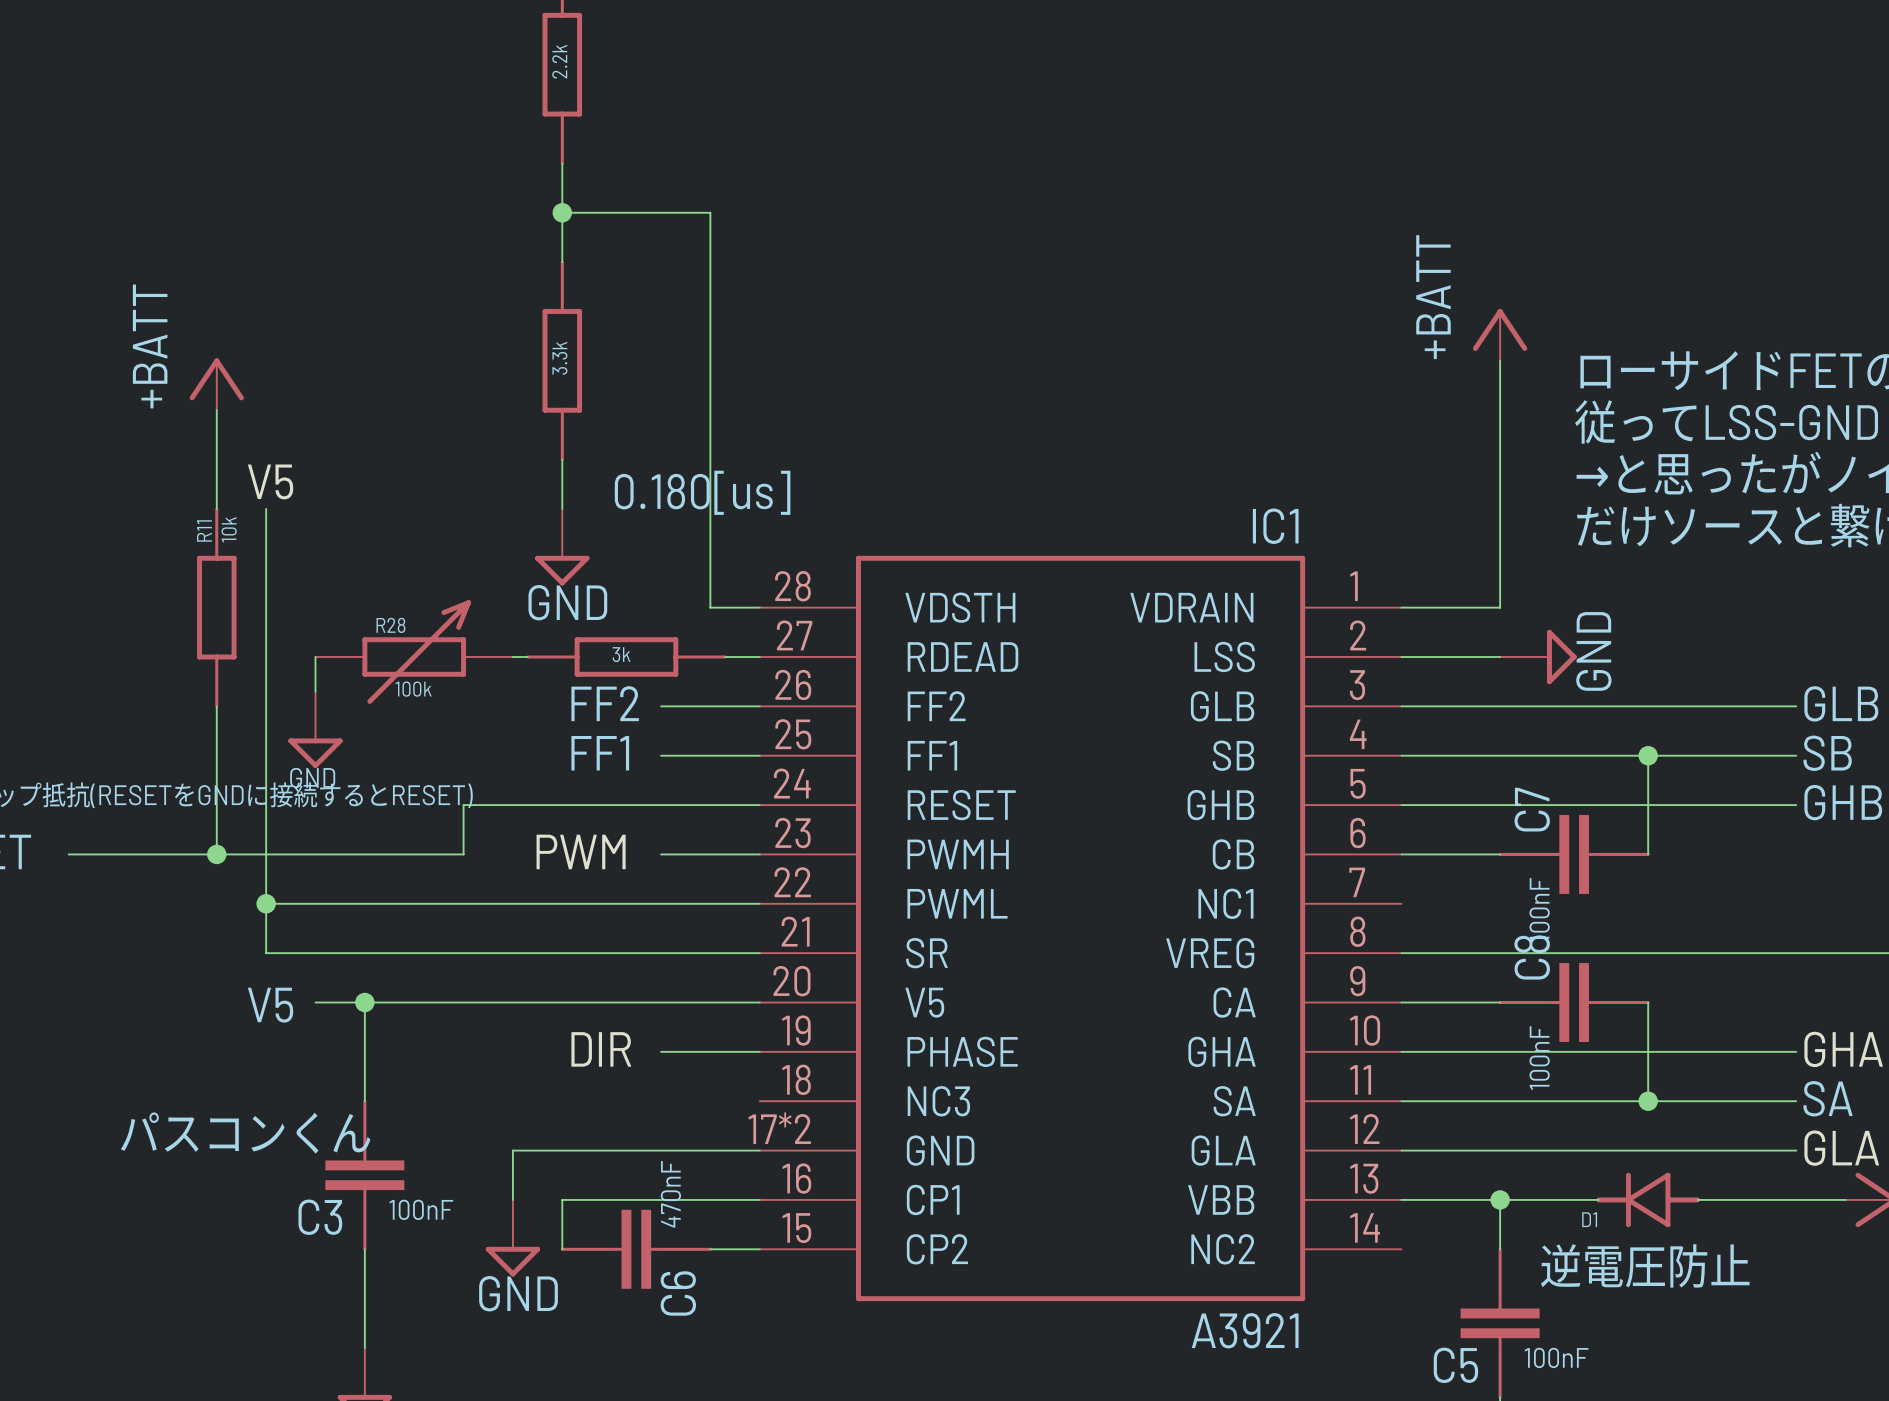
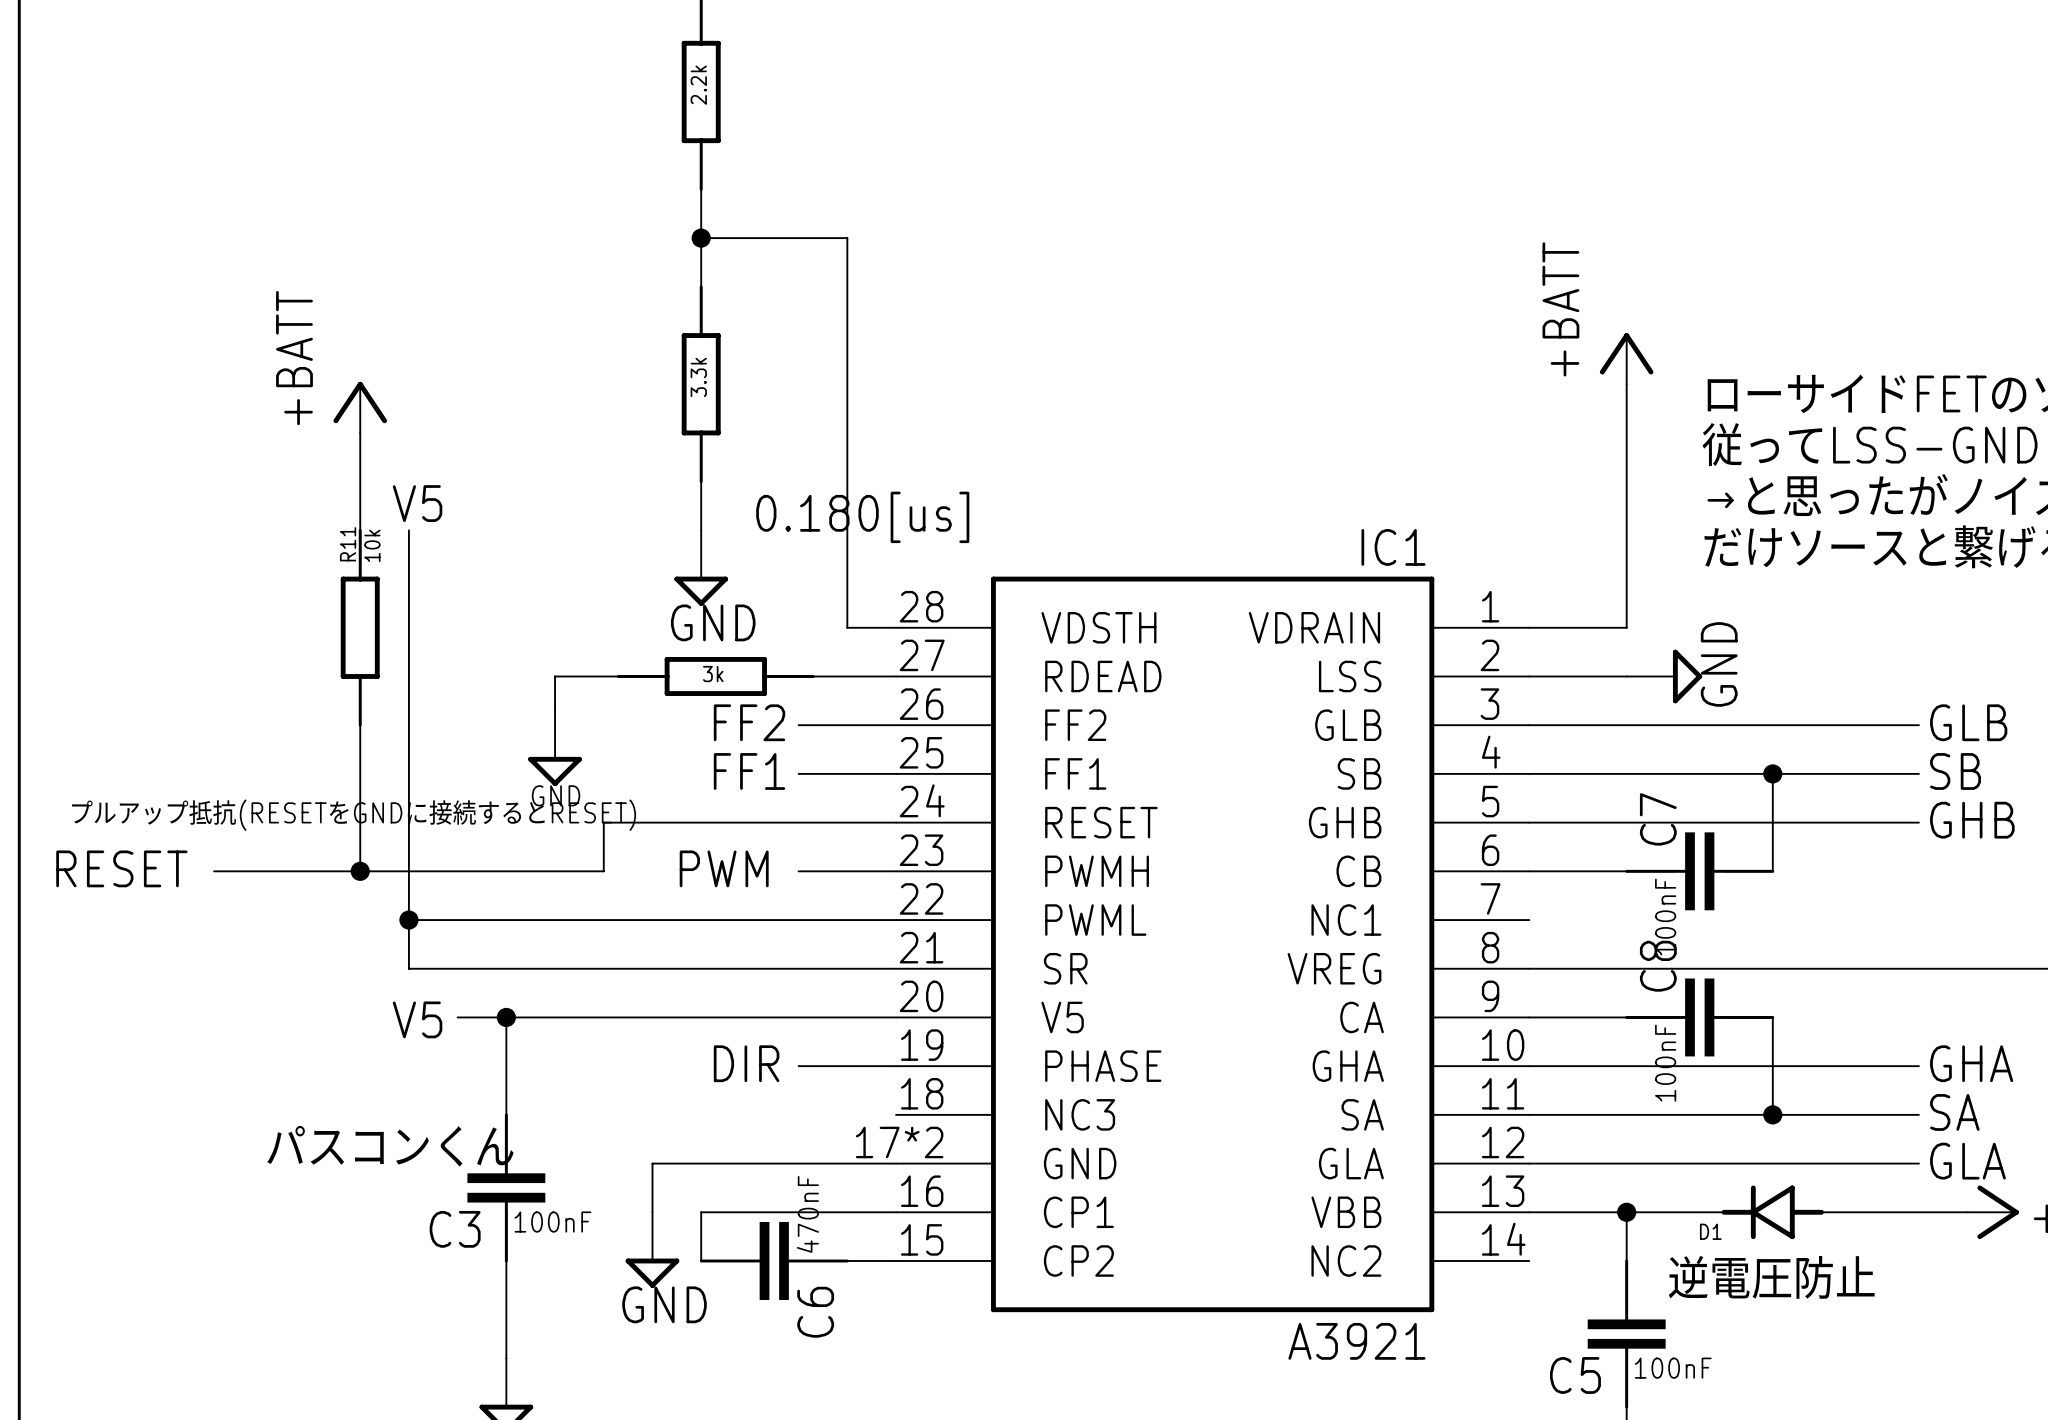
R28: 100k (414, 652) -> none
wire: (315, 657) (315, 691) -> none
wire: none -> (618, 676) (555, 676) (555, 710)
part position: (626, 657) -> (715, 676)
power symbol position: GND (315, 729) -> GND (555, 748)

